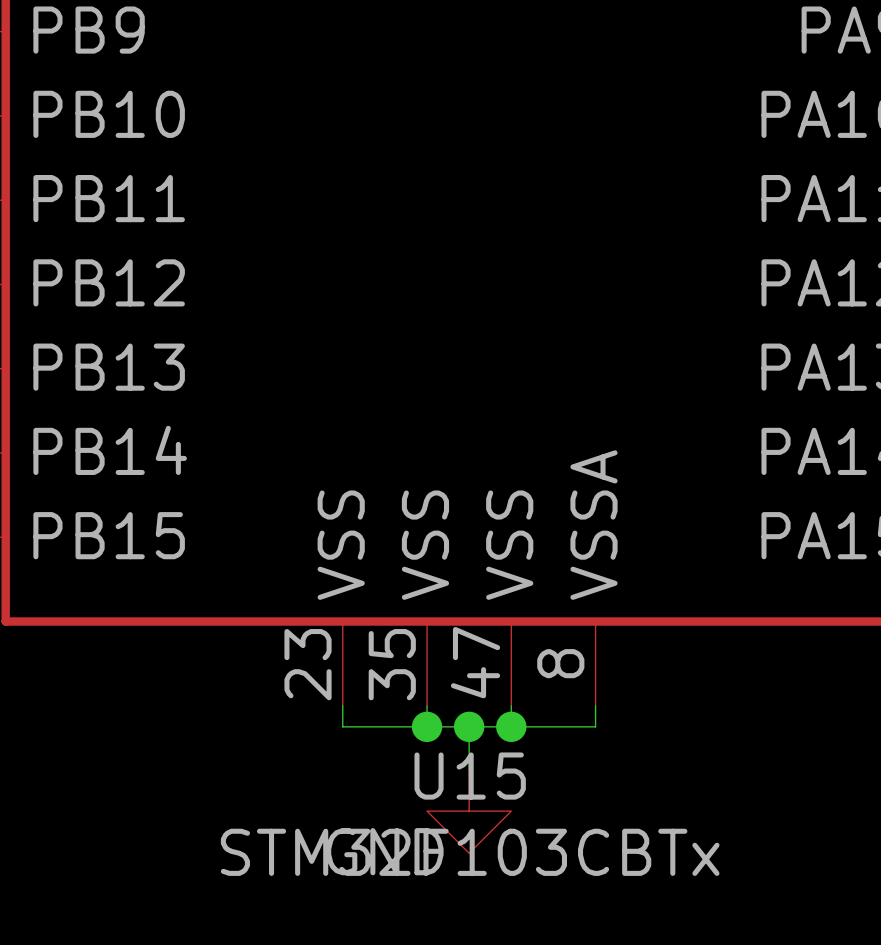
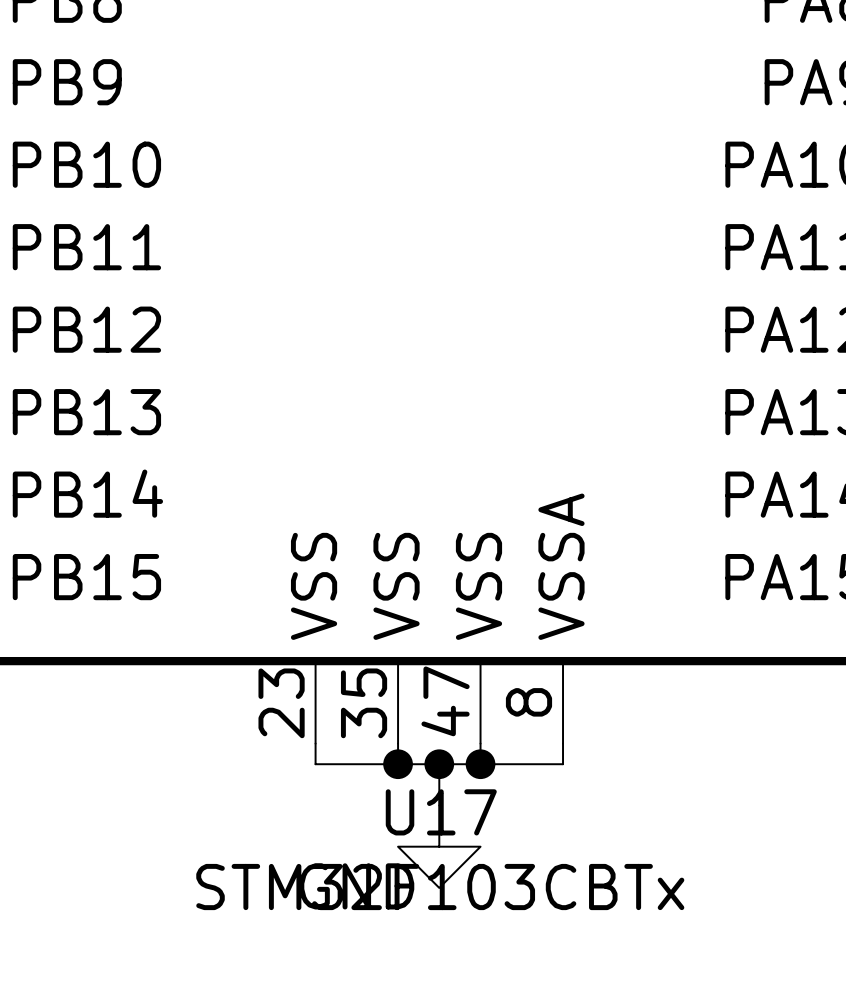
U15 name: U15 (470, 776) -> U17 (441, 812)

